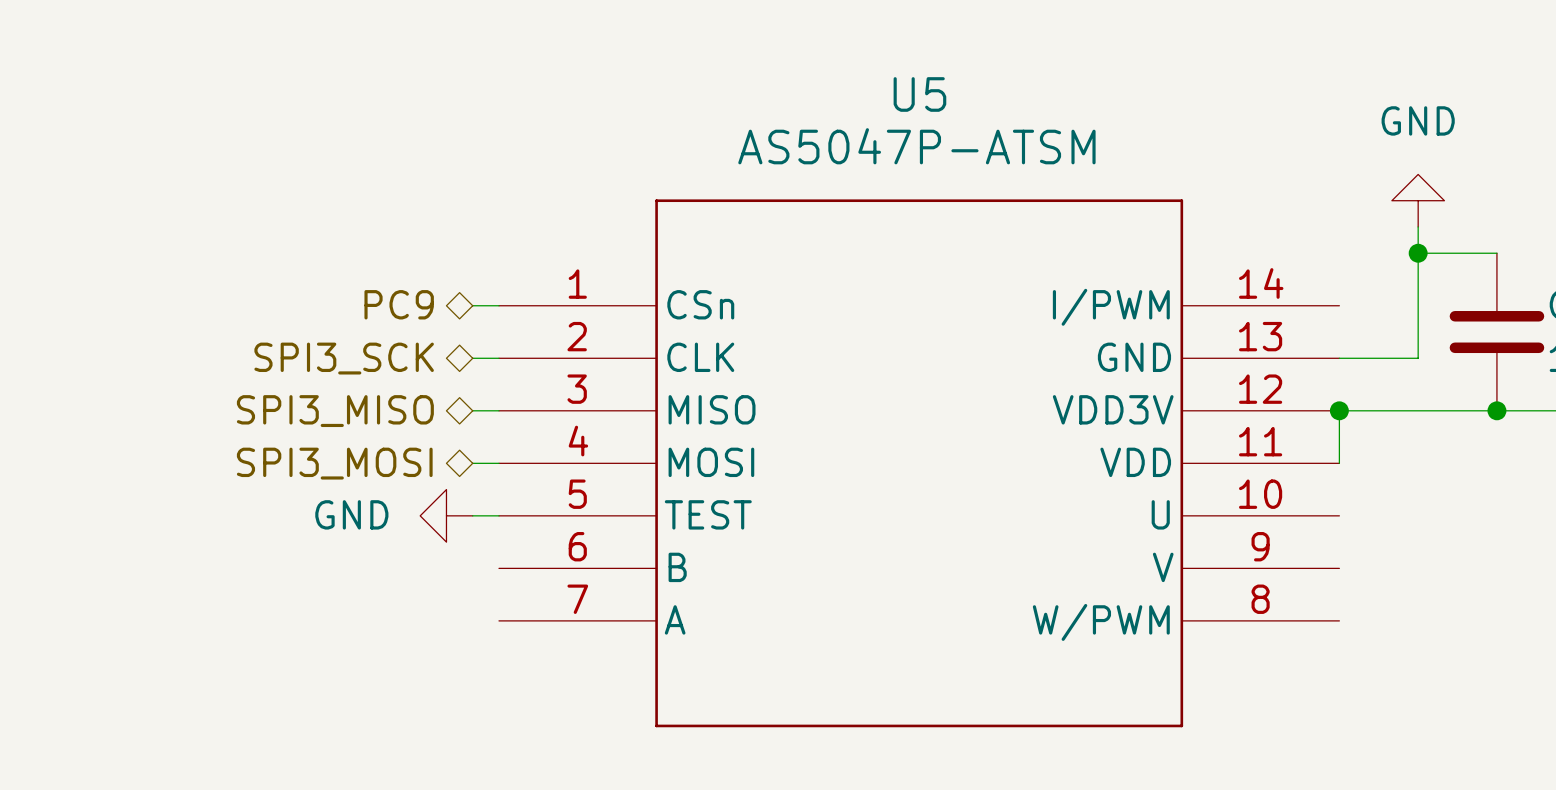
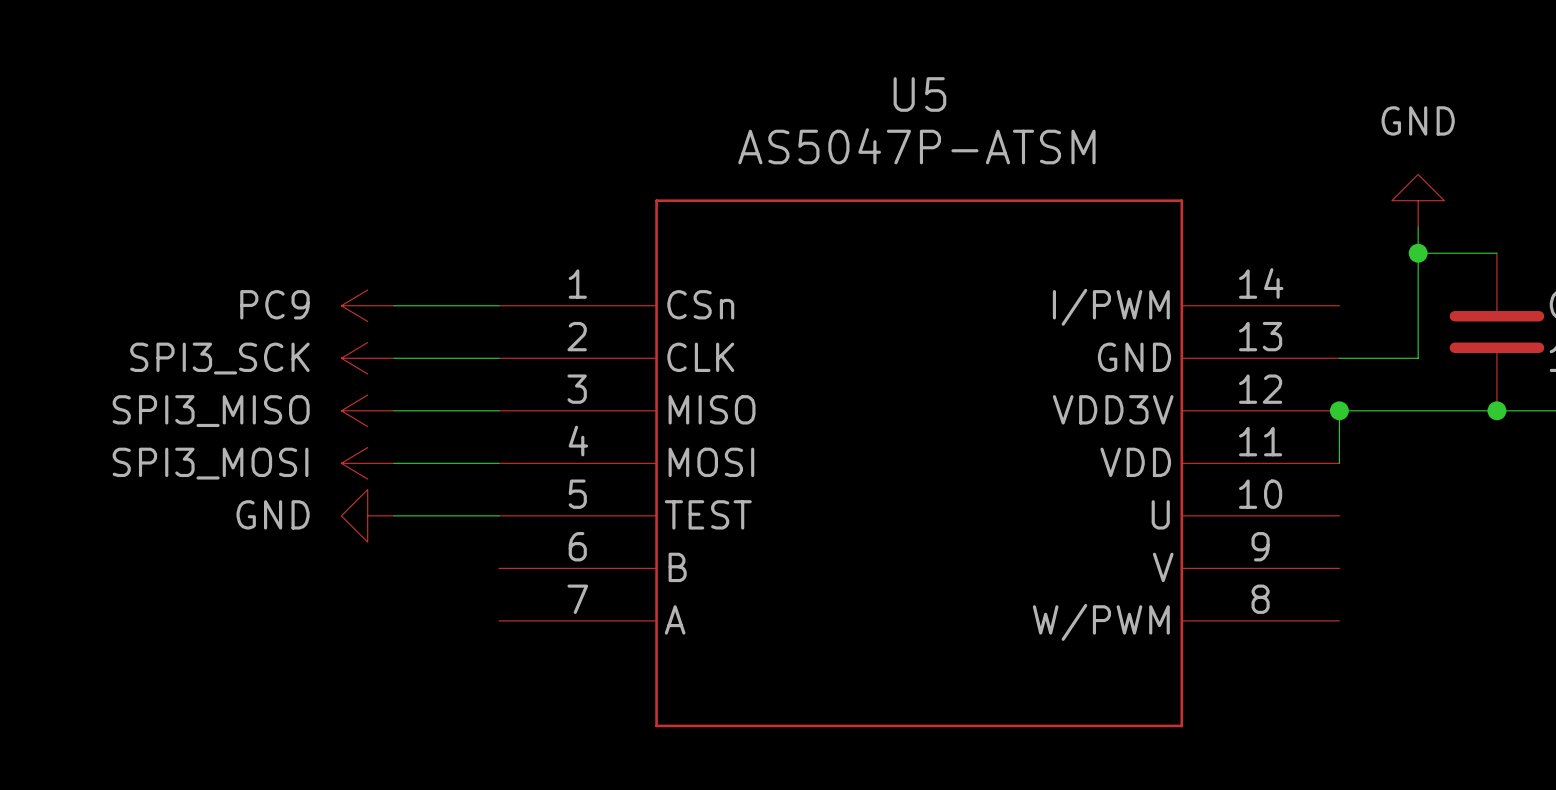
hierarchical label: PC9 (399, 304) -> none
power symbol: none -> PC9 (367, 305)
wire: none -> (393, 305) (472, 305)
hierarchical label: SPI3_SCK (344, 358) -> none
power symbol: none -> SPI3_SCK (367, 358)
wire: none -> (393, 358) (472, 358)
power symbol: none -> SPI3_MISO (367, 410)
wire: none -> (393, 410) (472, 410)
hierarchical label: SPI3_MISO (335, 411) -> none
hierarchical label: SPI3_MOSI (334, 463) -> none
power symbol: none -> SPI3_MOSI (367, 463)
wire: none -> (393, 463) (472, 463)
wire: none -> (393, 515) (472, 515)
power symbol position: GND (446, 515) -> GND (367, 515)

